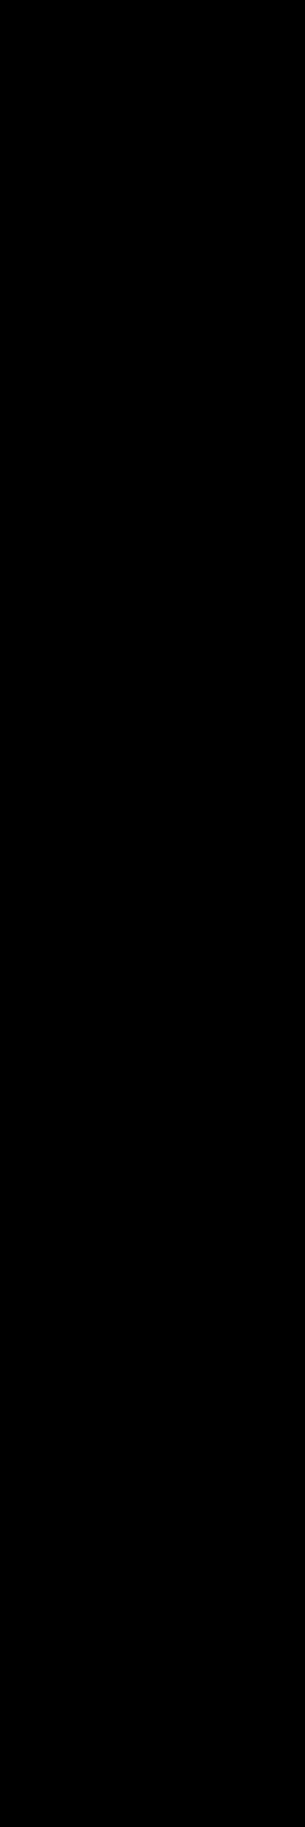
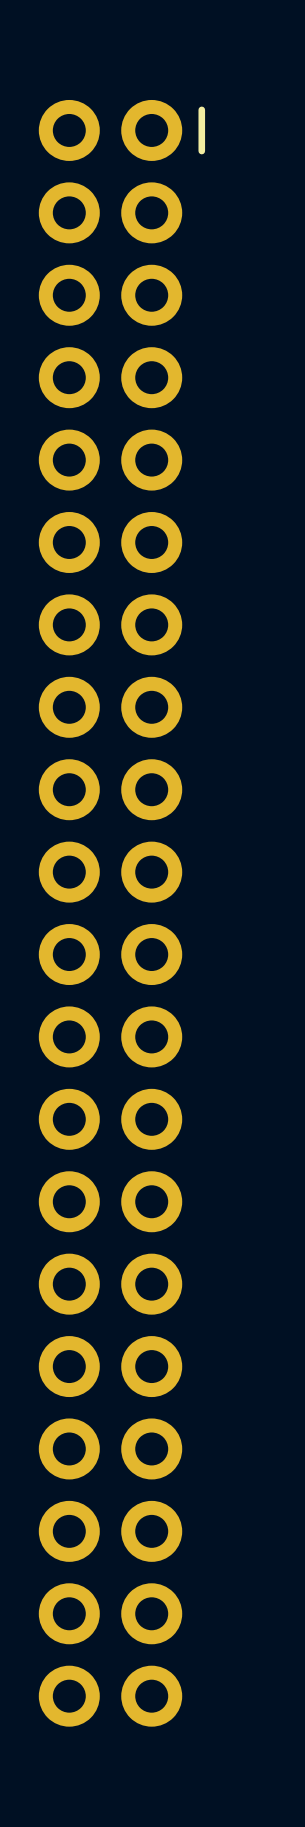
part: none -> (121, 913)

